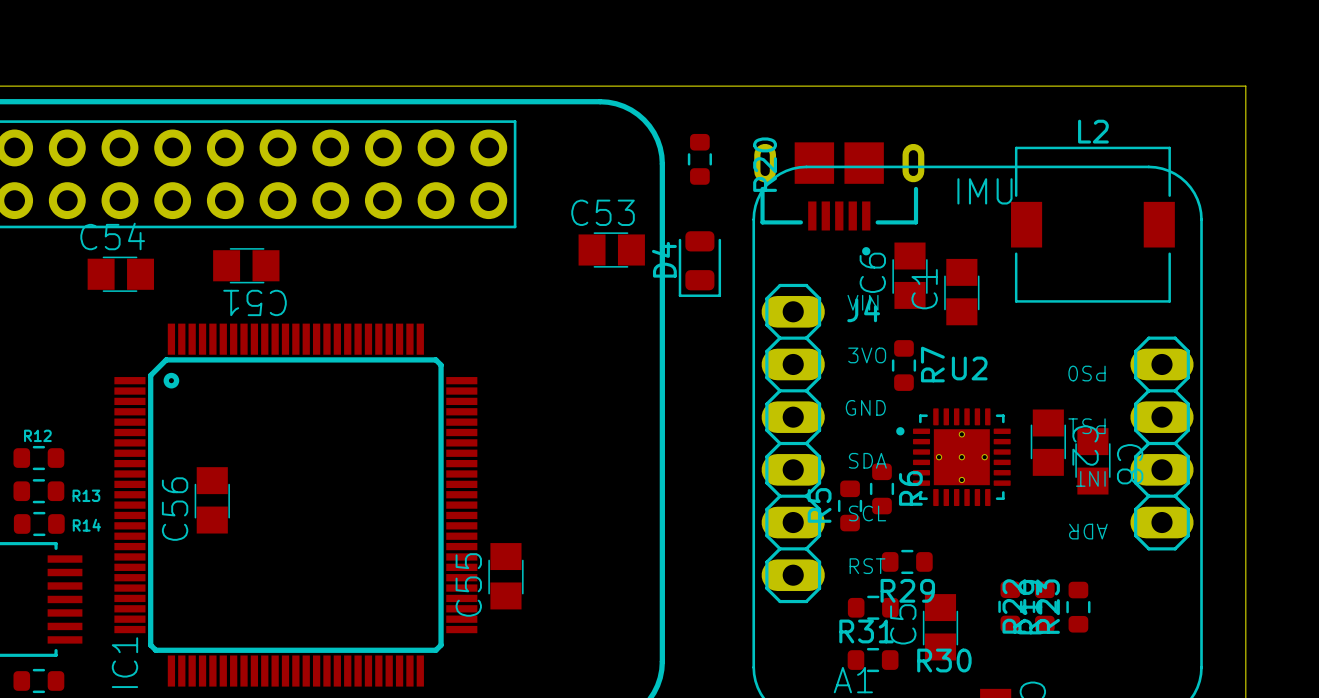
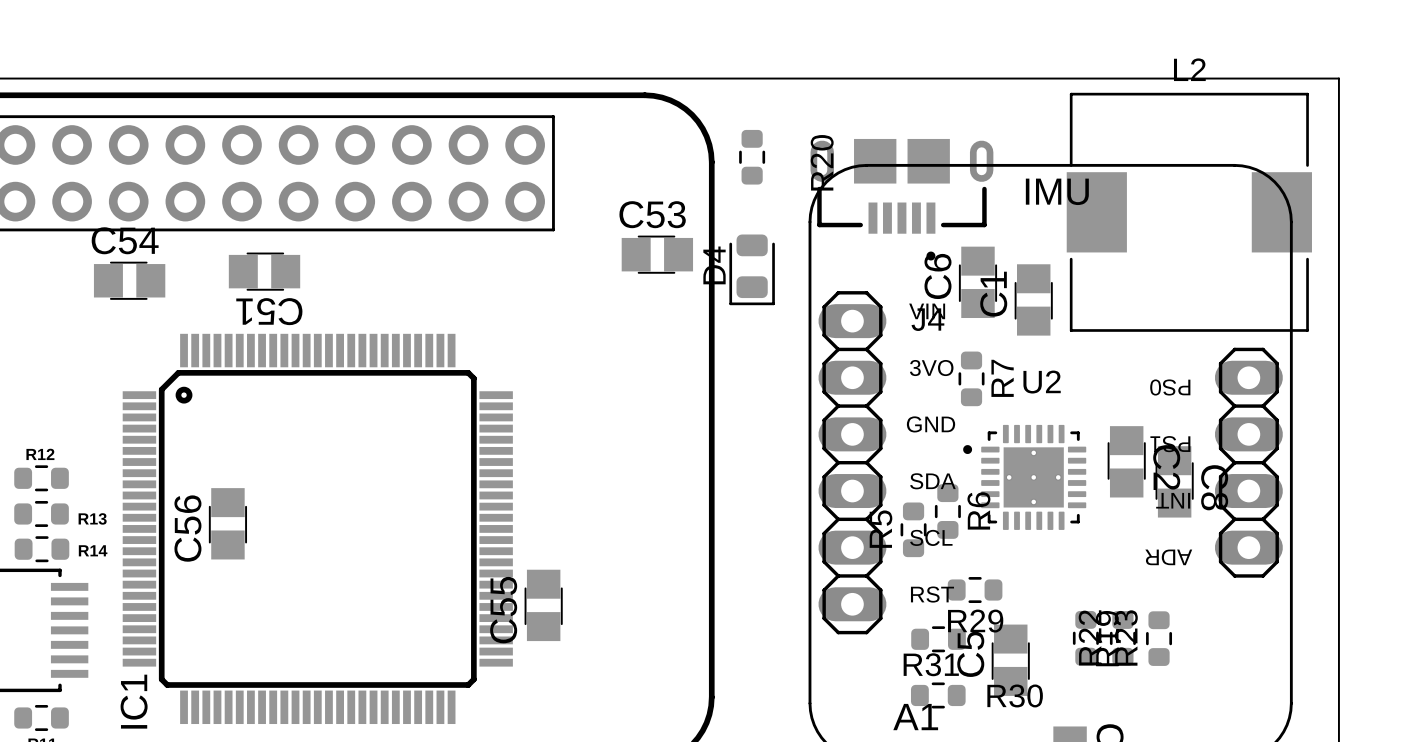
L2 footprint: [1011, 146, 1175, 303] -> [1066, 92, 1312, 332]

